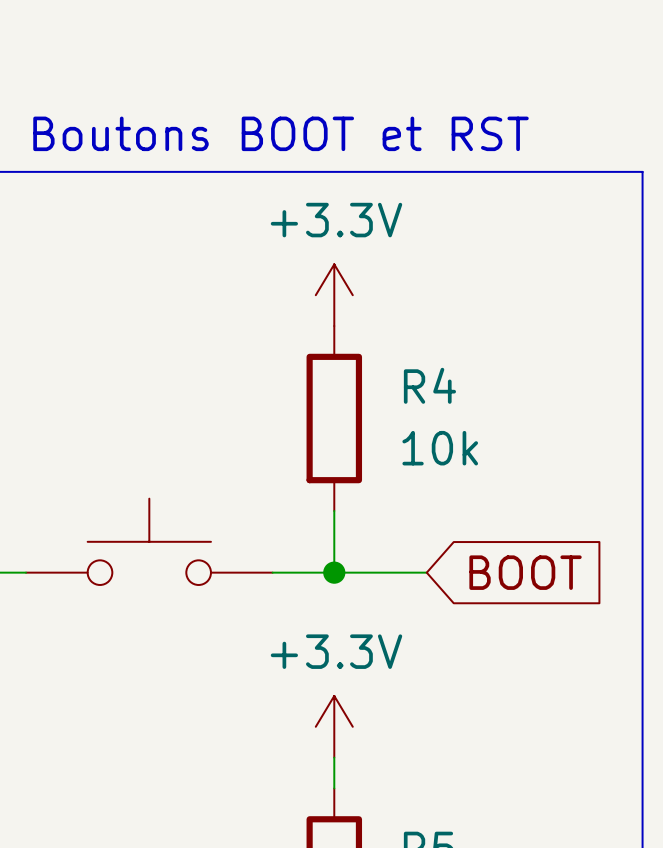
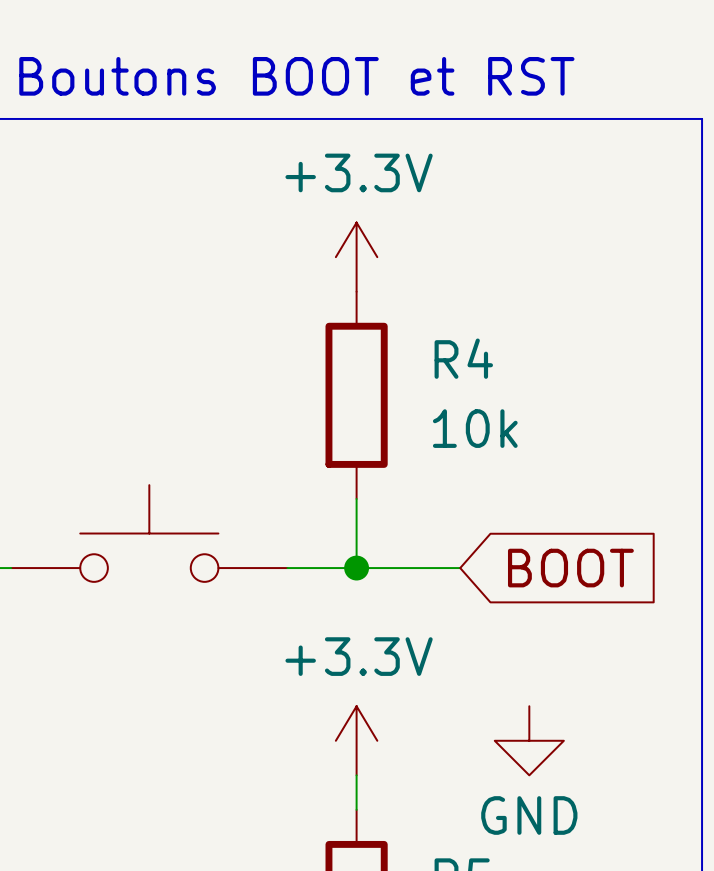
power symbol: none -> GND (529, 740)

